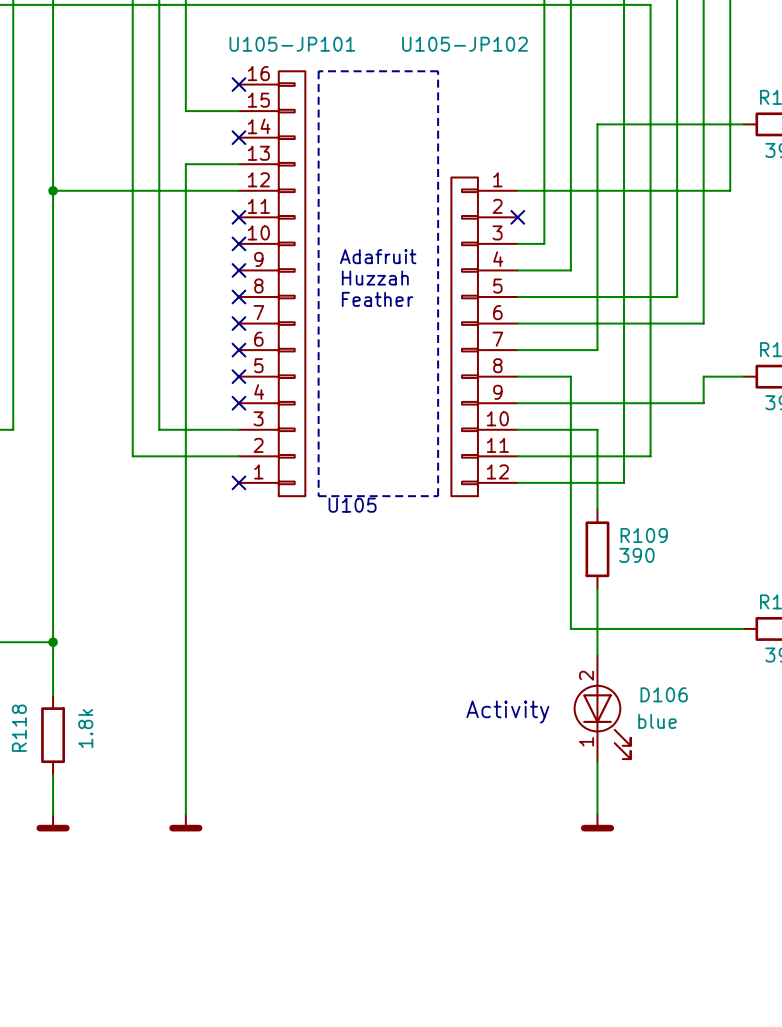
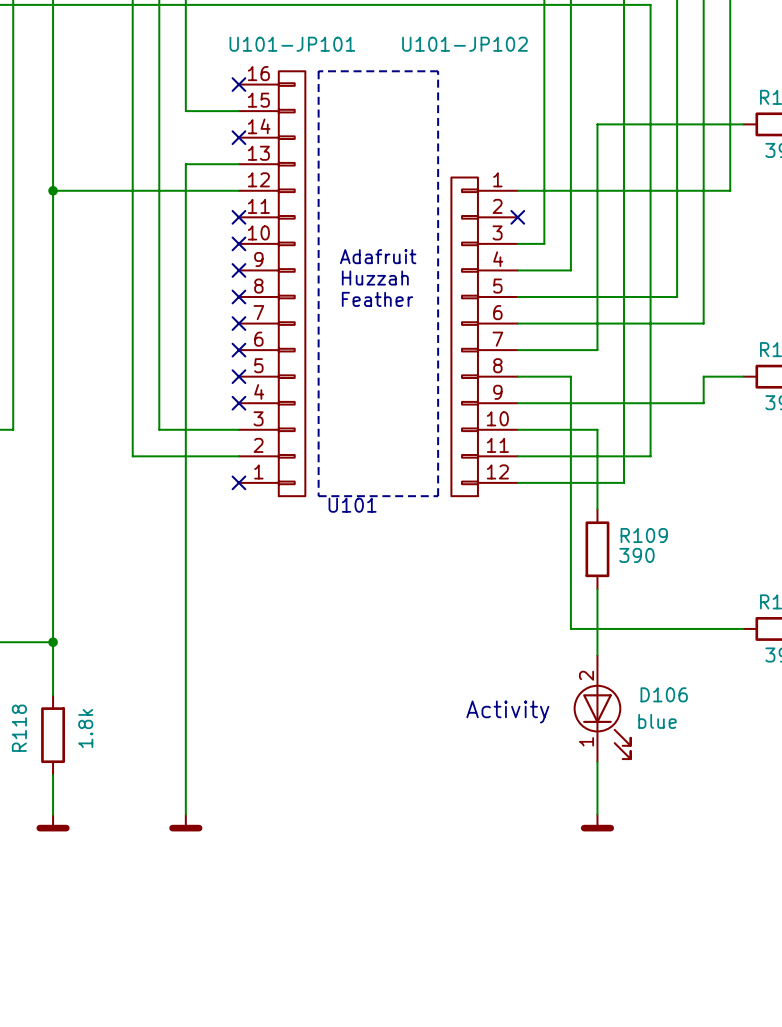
U105-JP101 name: U105-JP101 (292, 44) -> U101-JP101 (292, 44)
U105-JP102 name: U105-JP102 (464, 44) -> U101-JP102 (464, 44)
text: U105 (352, 505) -> U101 (352, 505)

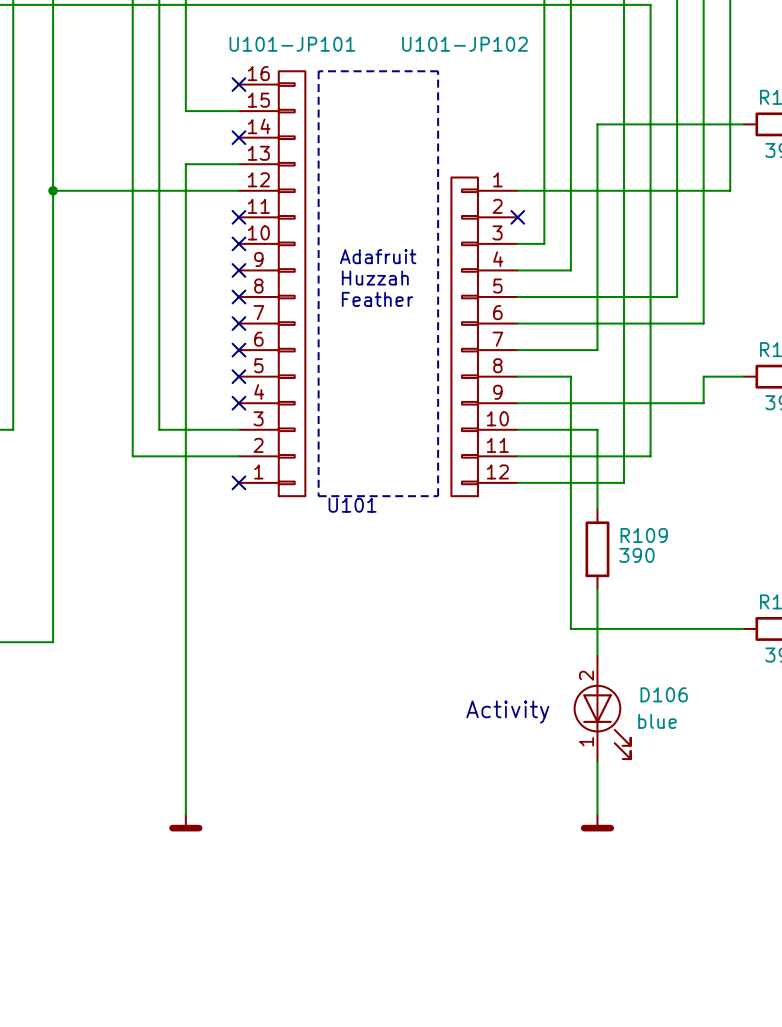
wire: (53, 642) (53, 695) -> none
junction: (53, 642) -> none
R118: 1.8k (53, 735) -> none
wire: (53, 775) (53, 814) -> none
power symbol: (53, 823) -> none

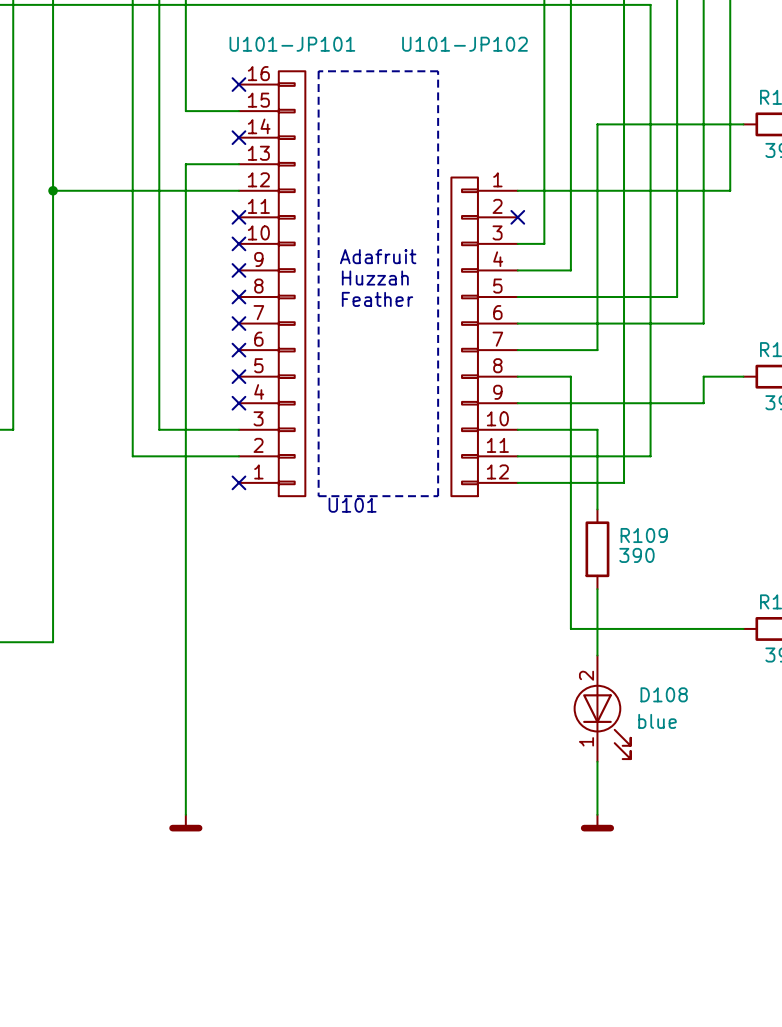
D106 name: D106 (664, 694) -> D108 (664, 694)
text: Activity (507, 712) -> none

